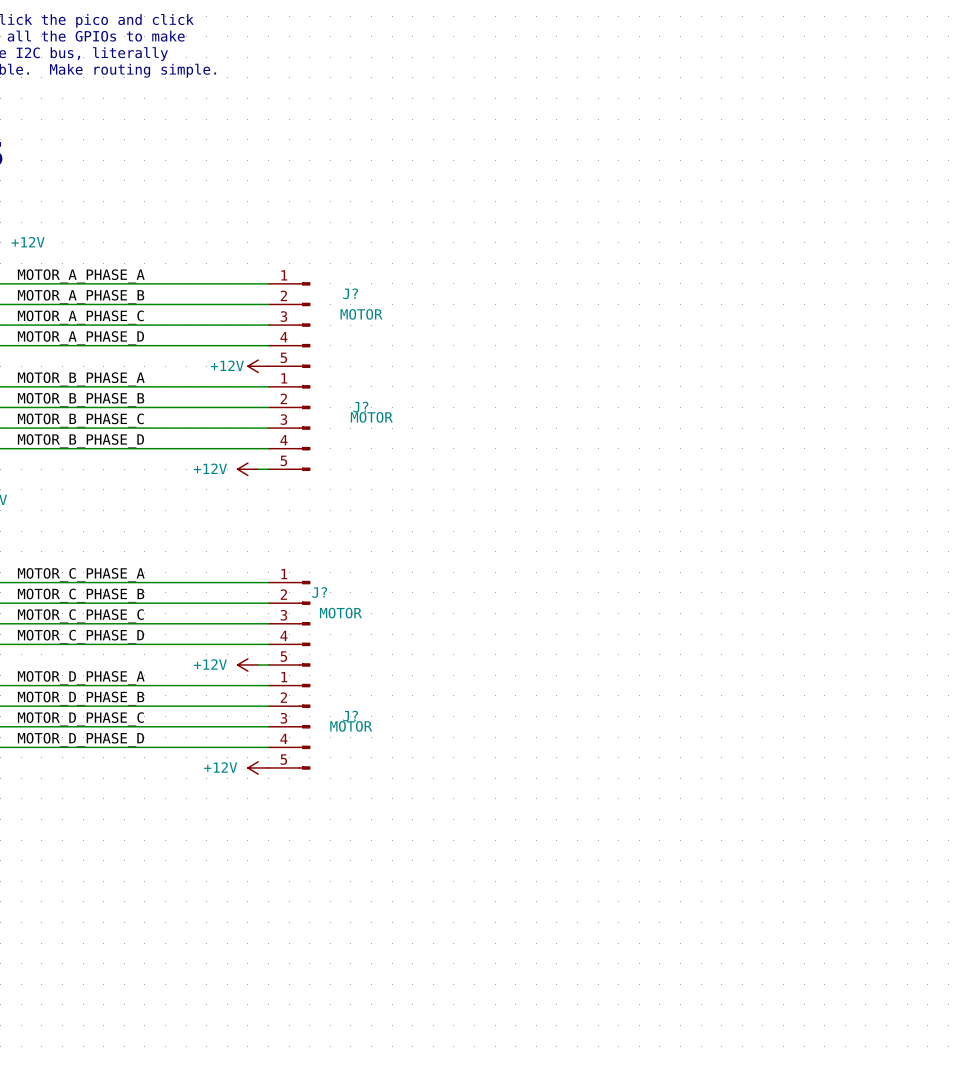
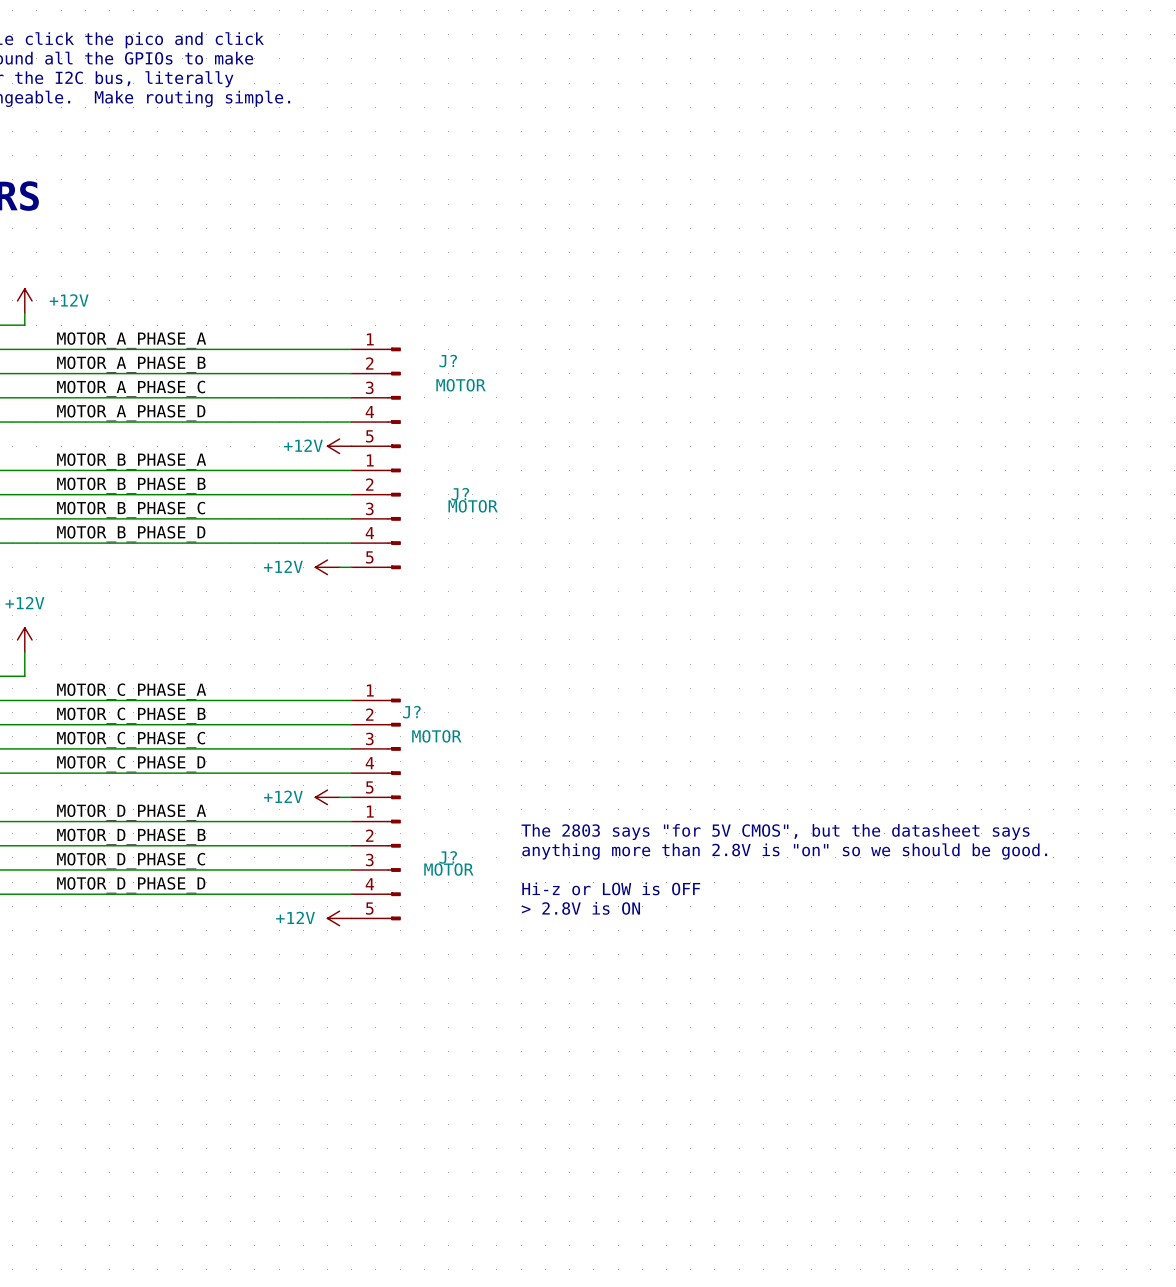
text: none -> The 2803 says "for 5V CMOS", but the datasheet says (775, 832)
text: none -> anything more than 2.8V is "on" so we should be good. (784, 851)
text: none -> Hi-z or LOW is OFF (611, 888)
text: none -> > 2.8V is ON (580, 908)

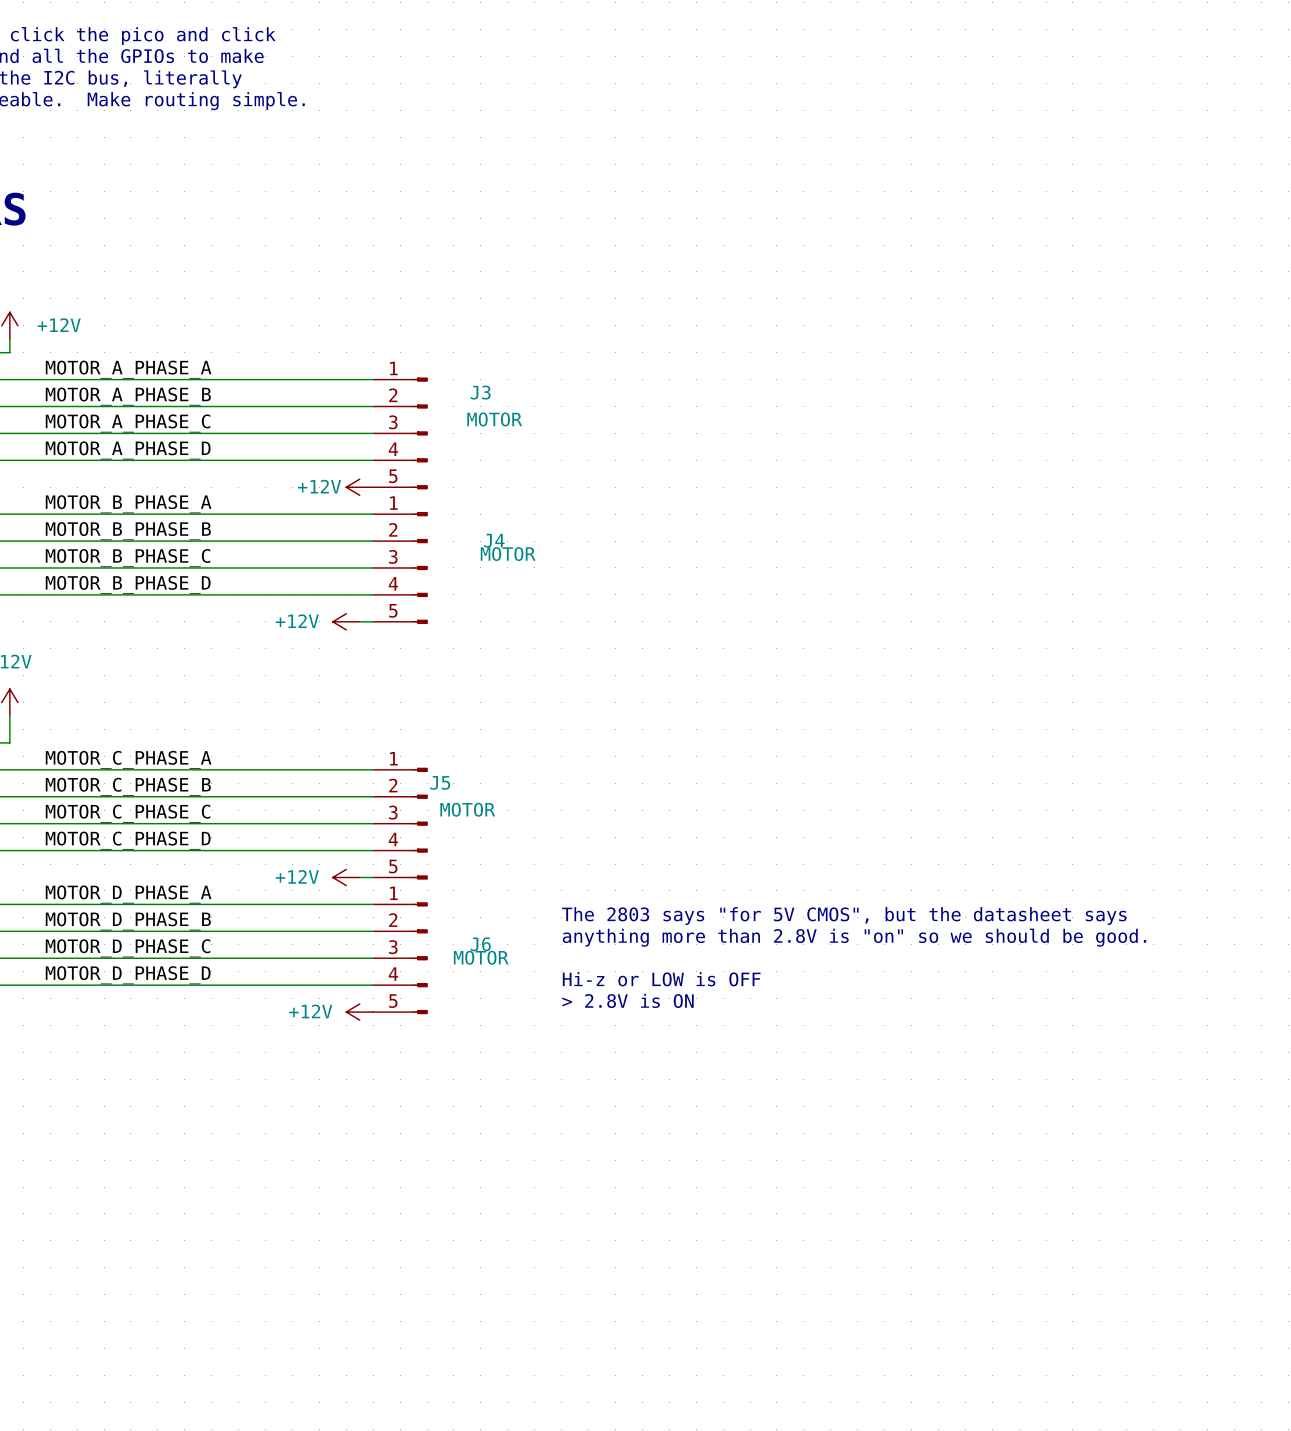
J? name: J? (448, 361) -> J3 (480, 392)
J? name: J? (460, 494) -> J4 (494, 540)
J? name: J? (411, 712) -> J5 (440, 782)
J? name: J? (448, 857) -> J6 (480, 944)

